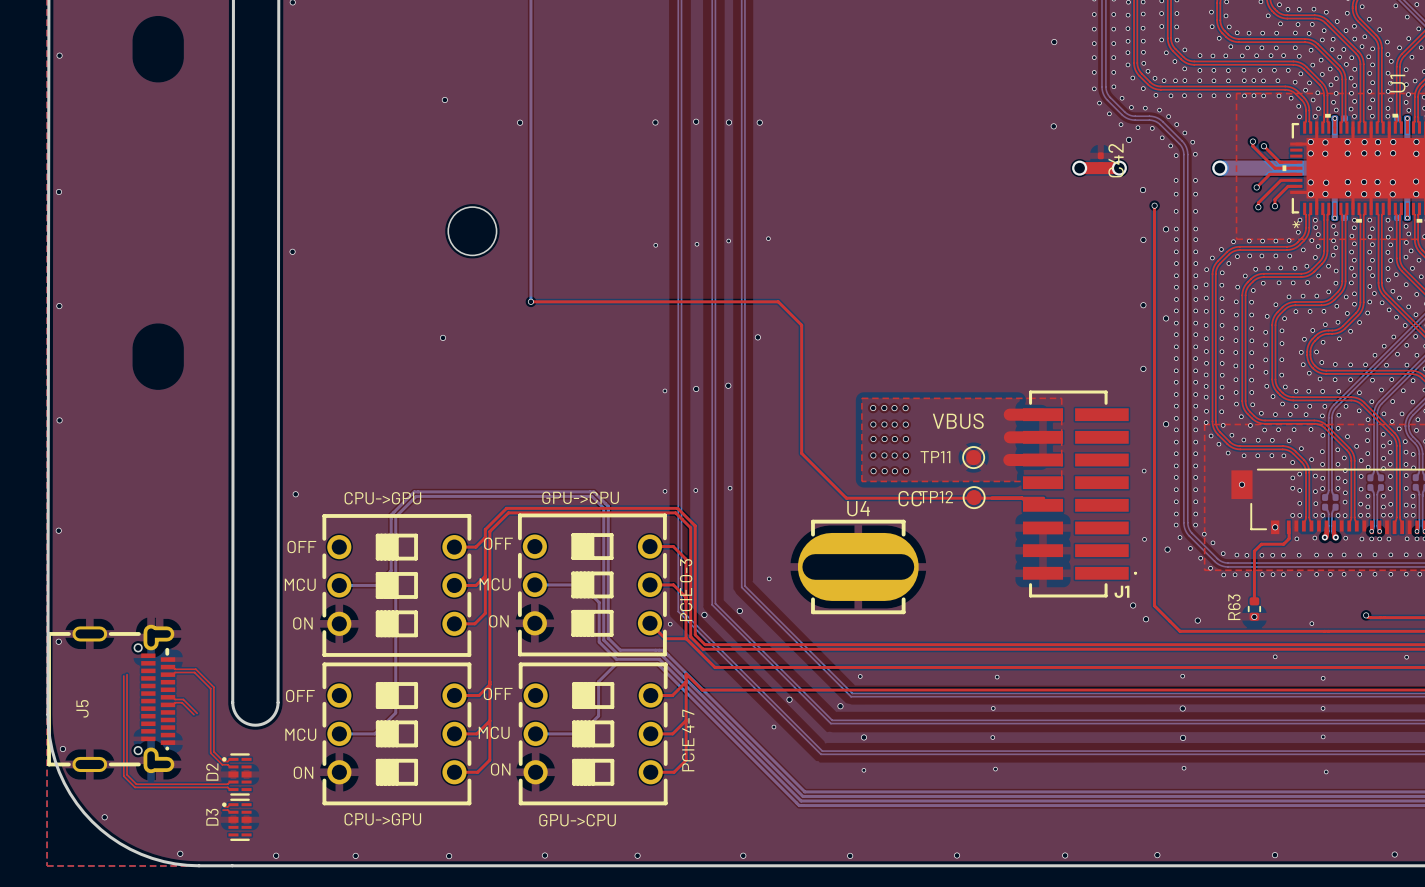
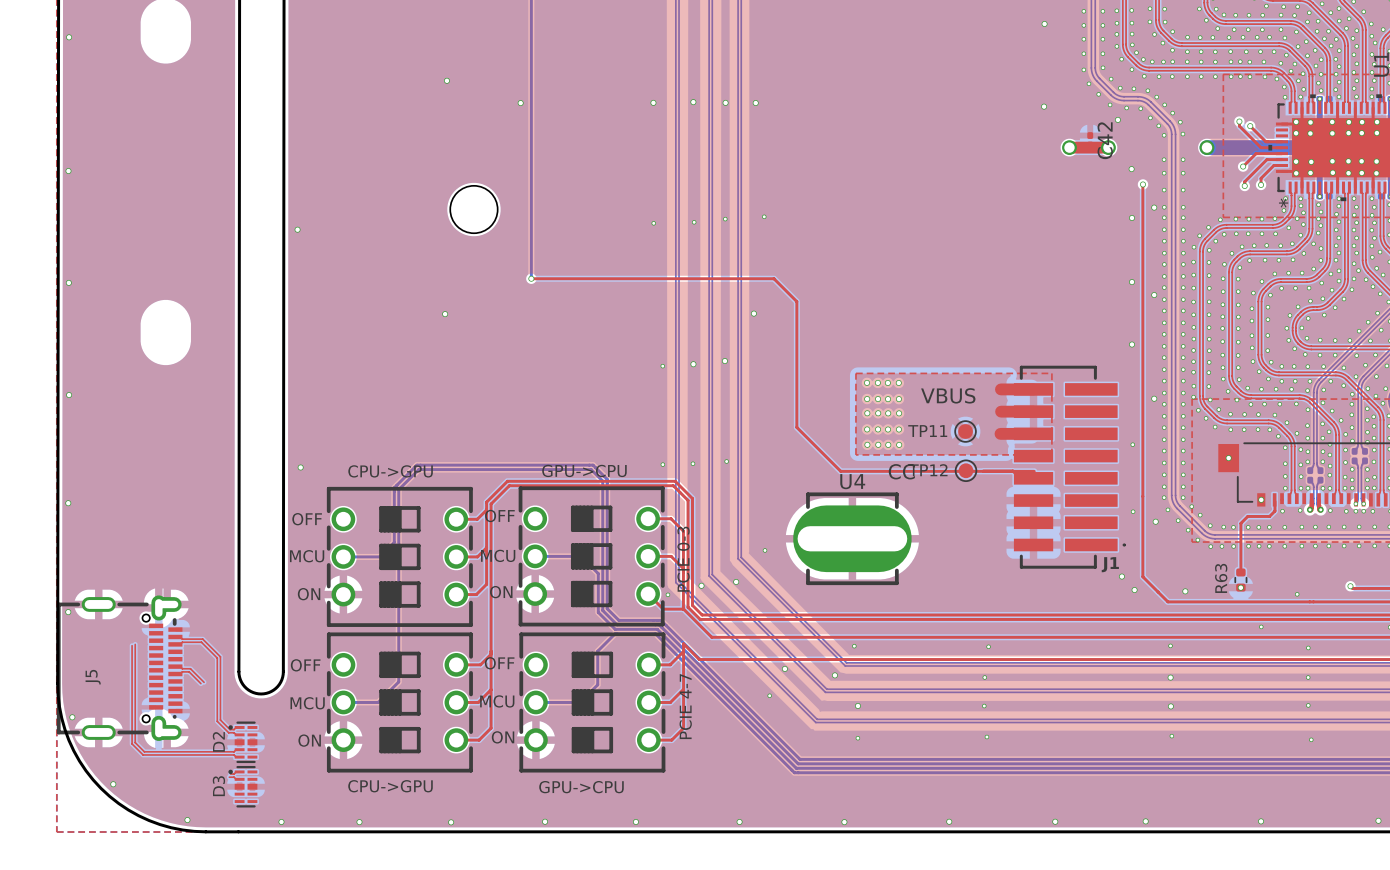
via: (1292, 477) -> none
via: (1292, 488) -> none
via: (1292, 515) -> none

